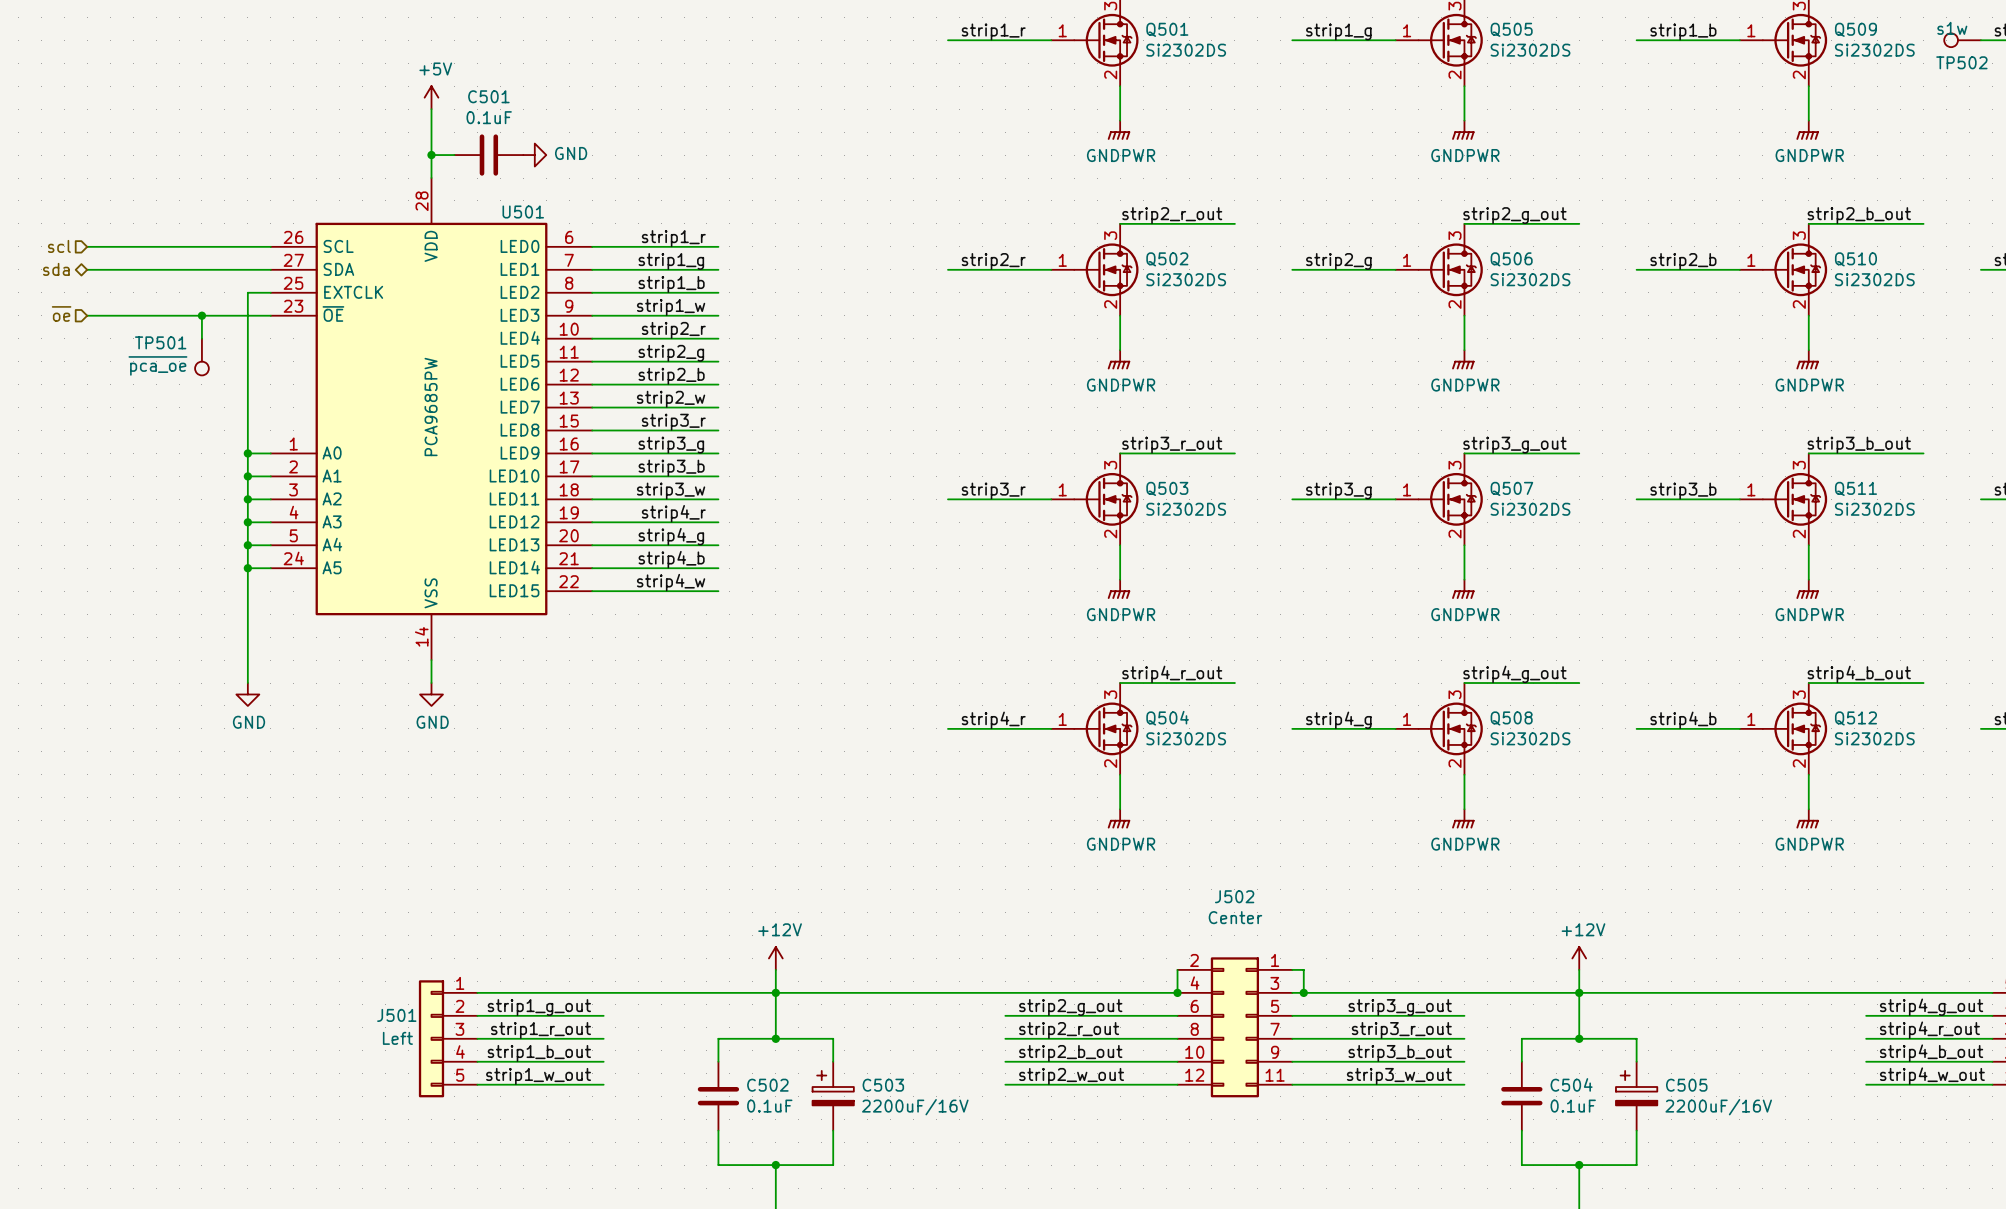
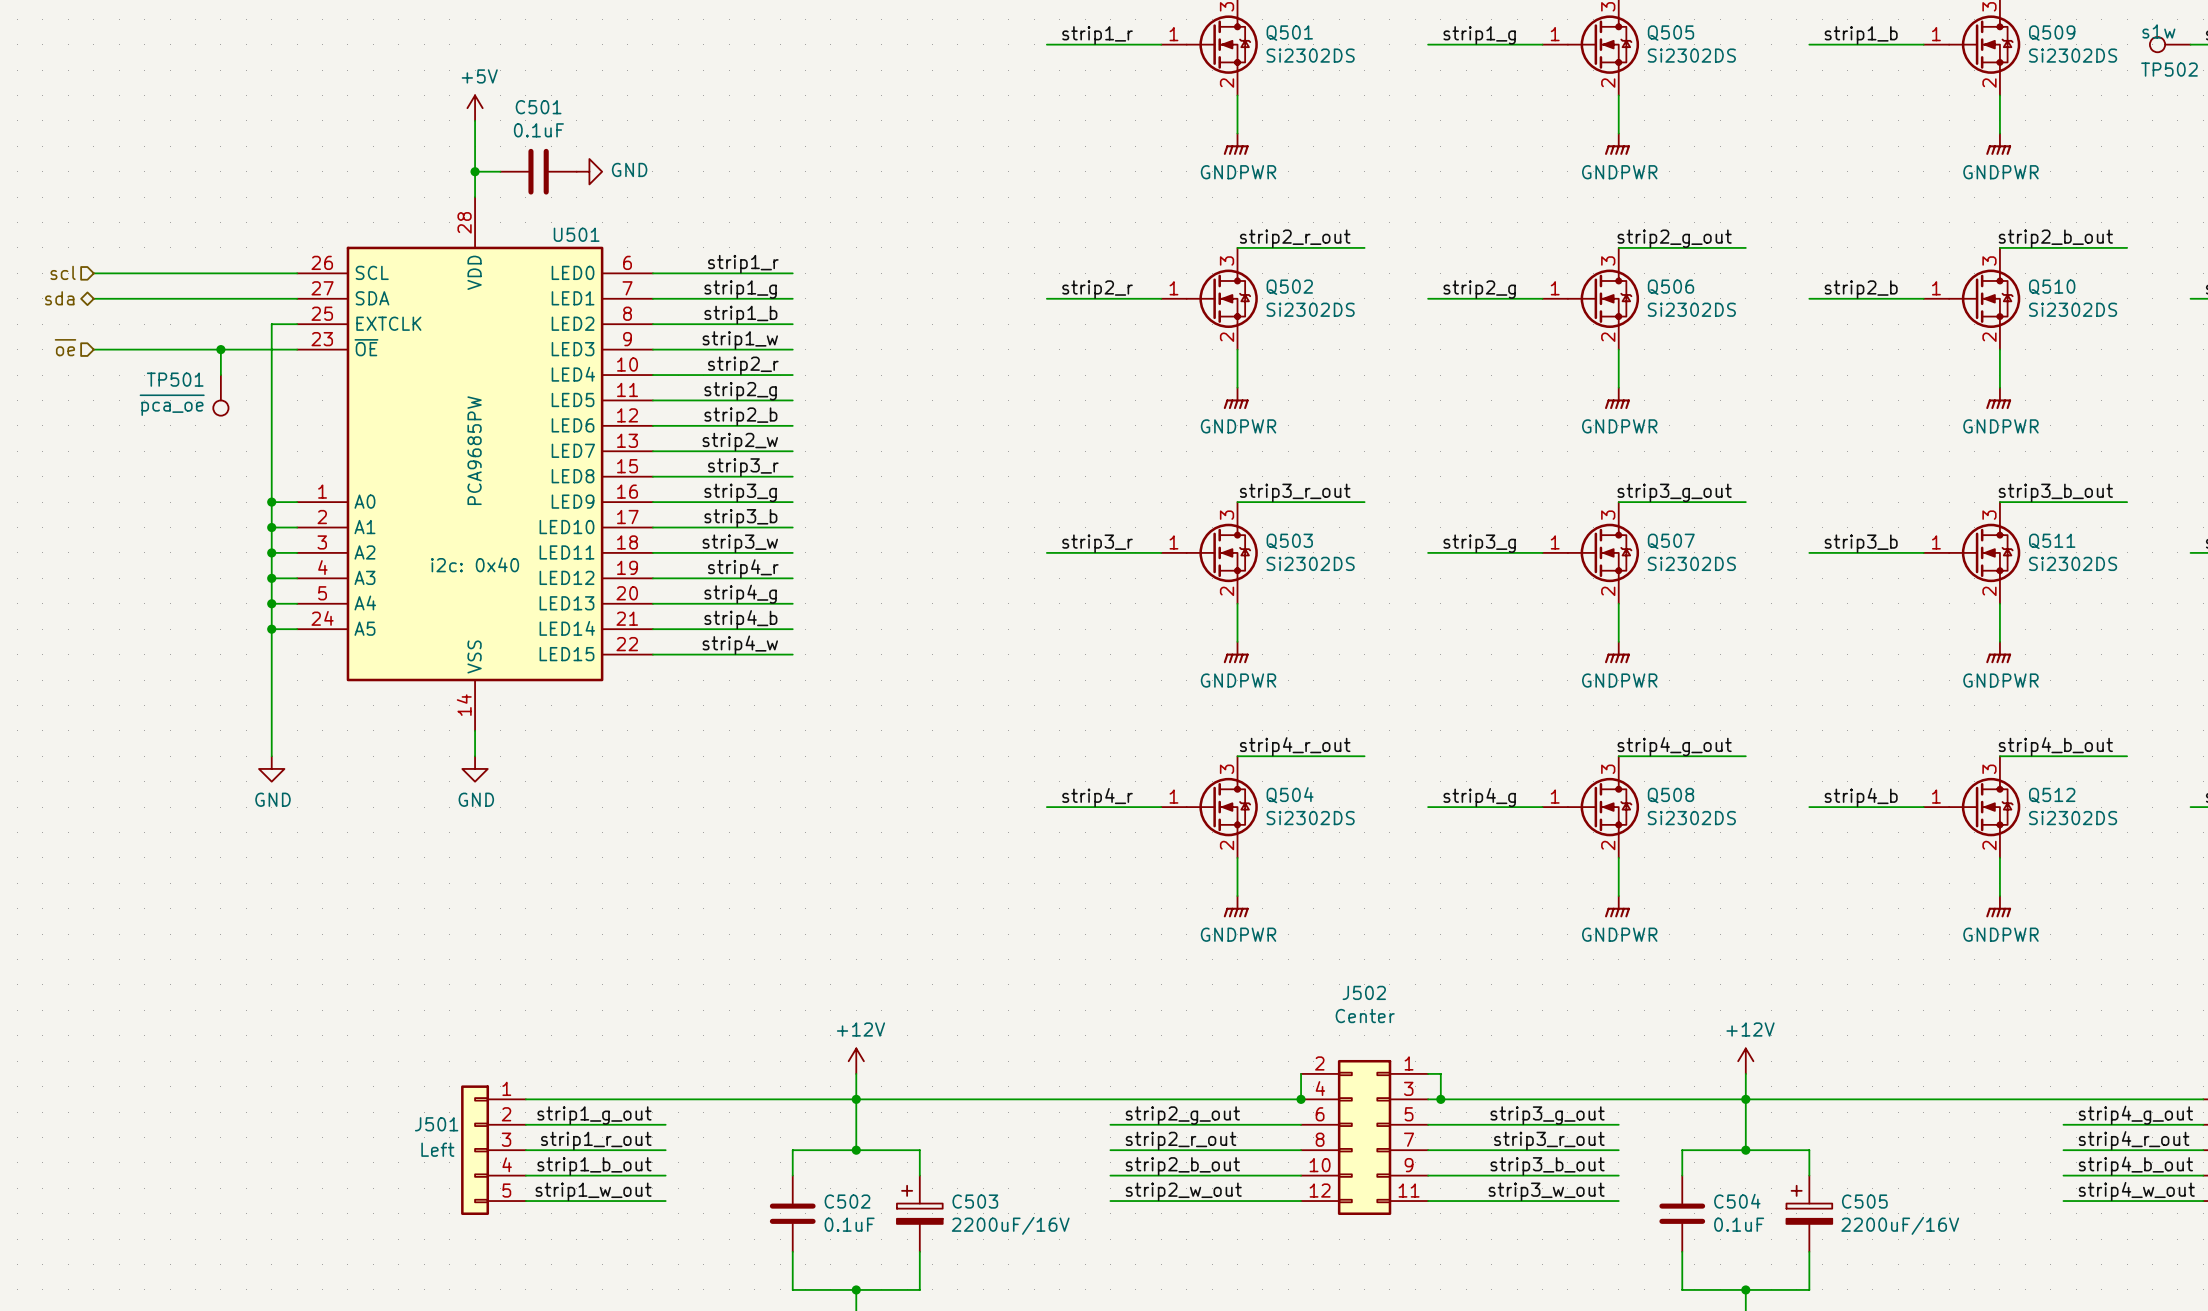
U501 text: none -> i2c: 0x40 (475, 564)

